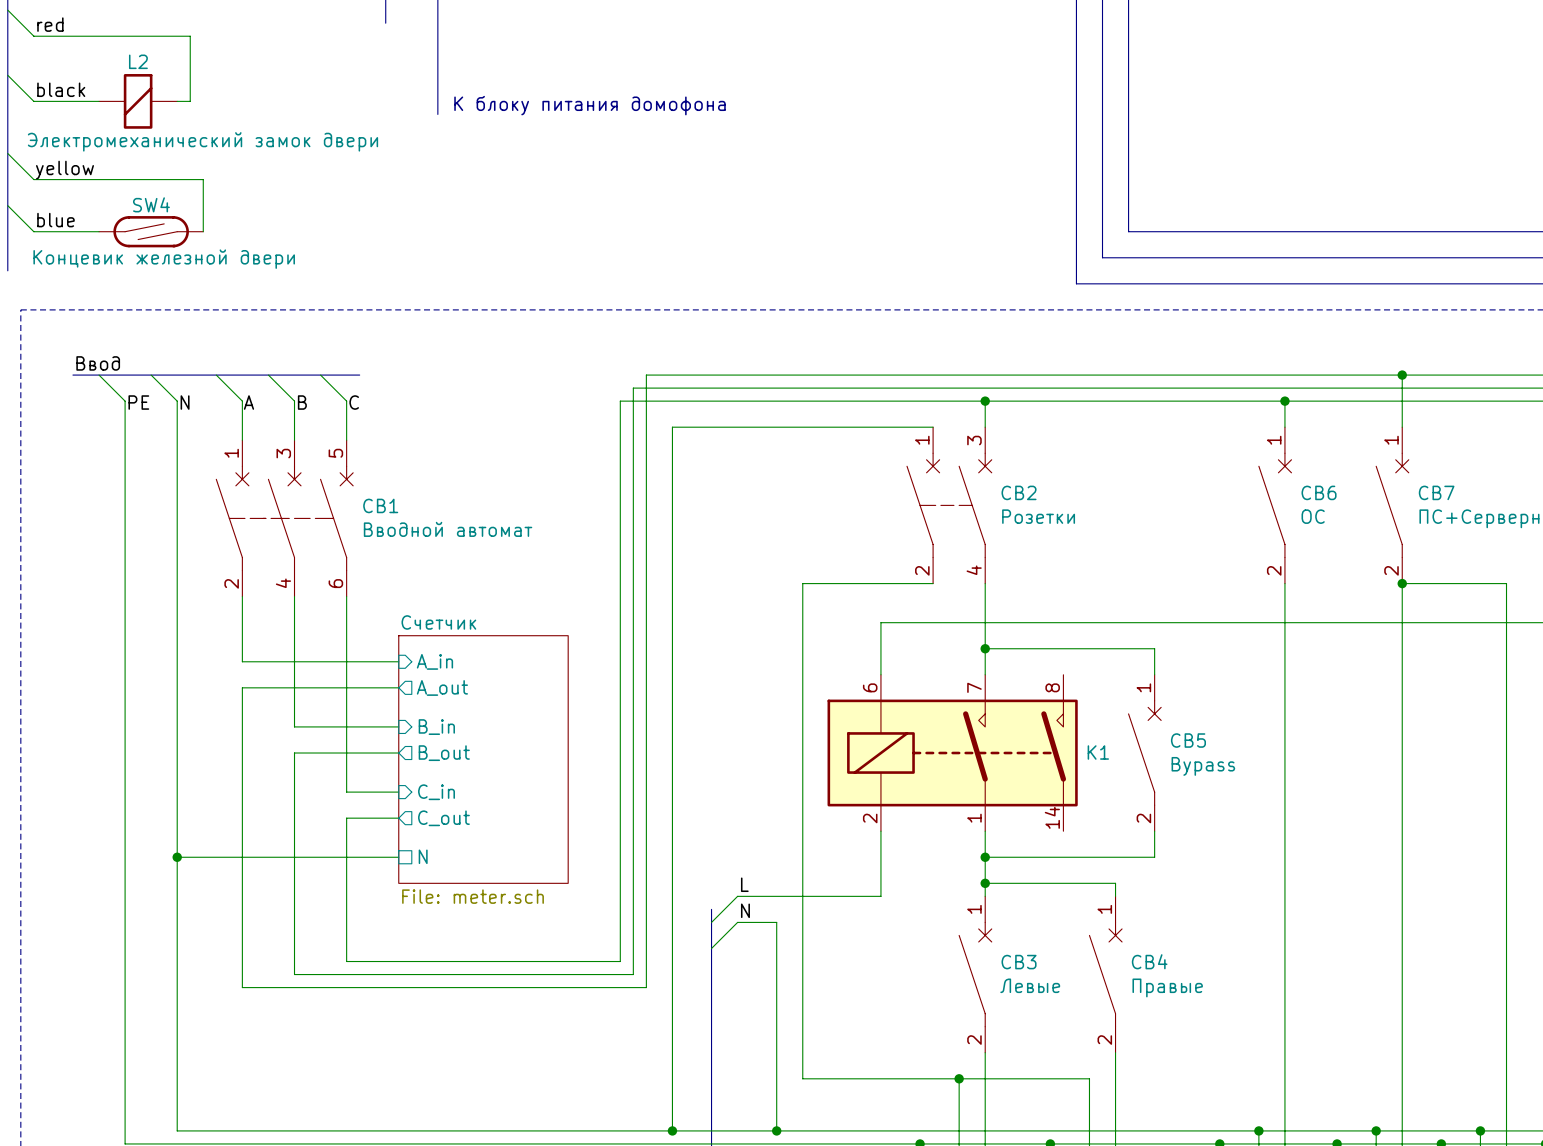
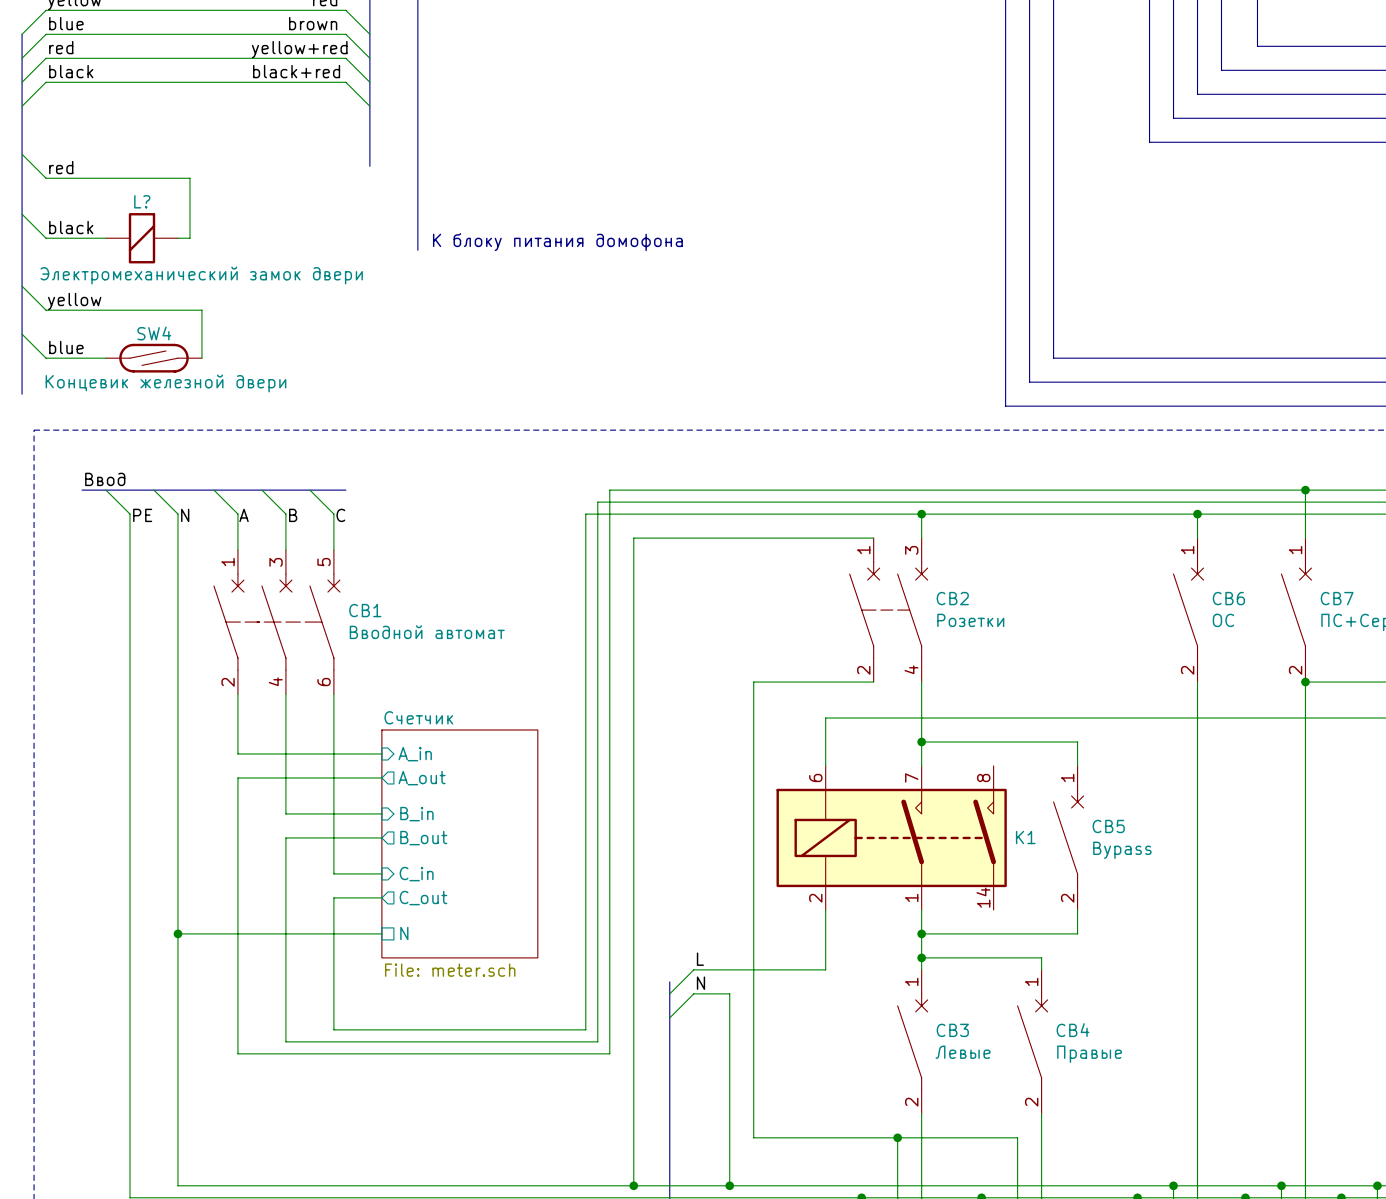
L2 name: L2 (138, 61) -> L? (142, 201)

